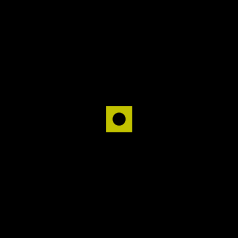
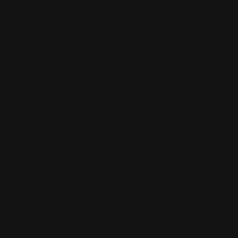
part: (119, 119) -> none

